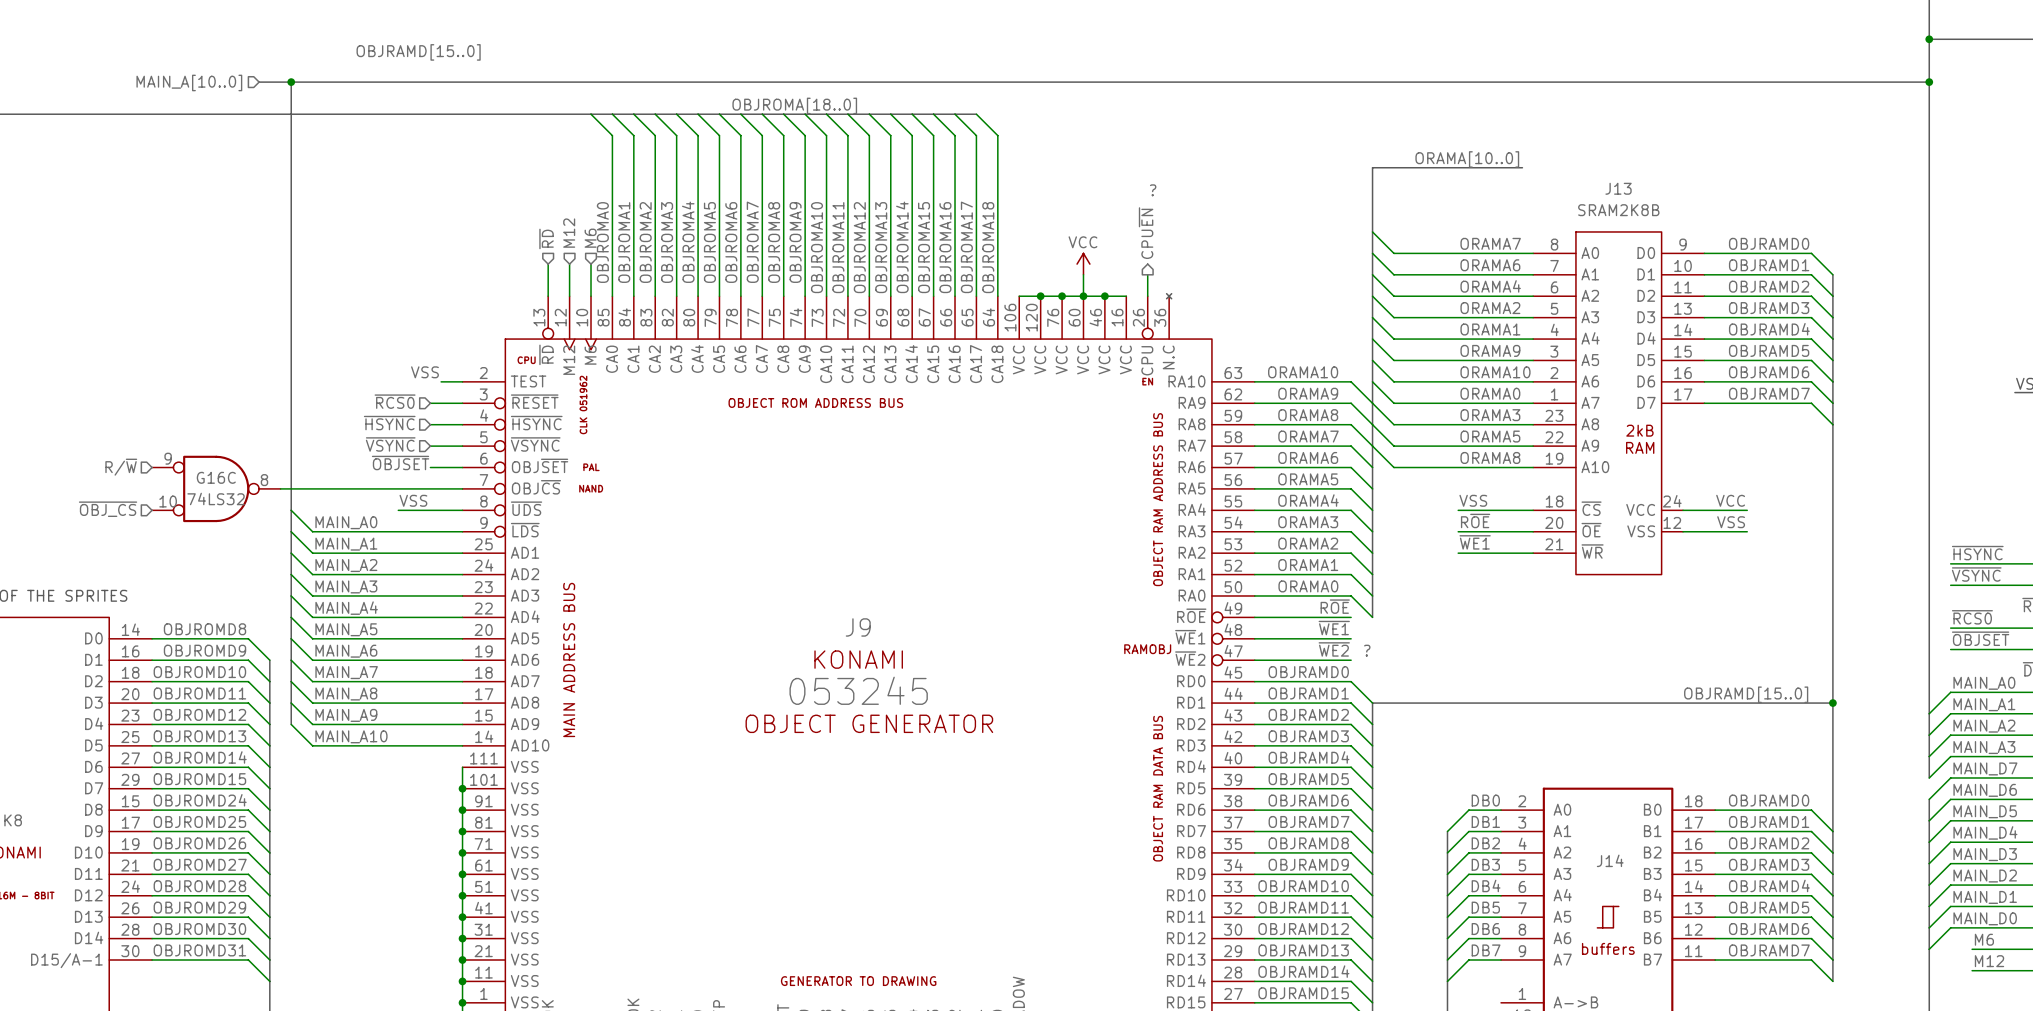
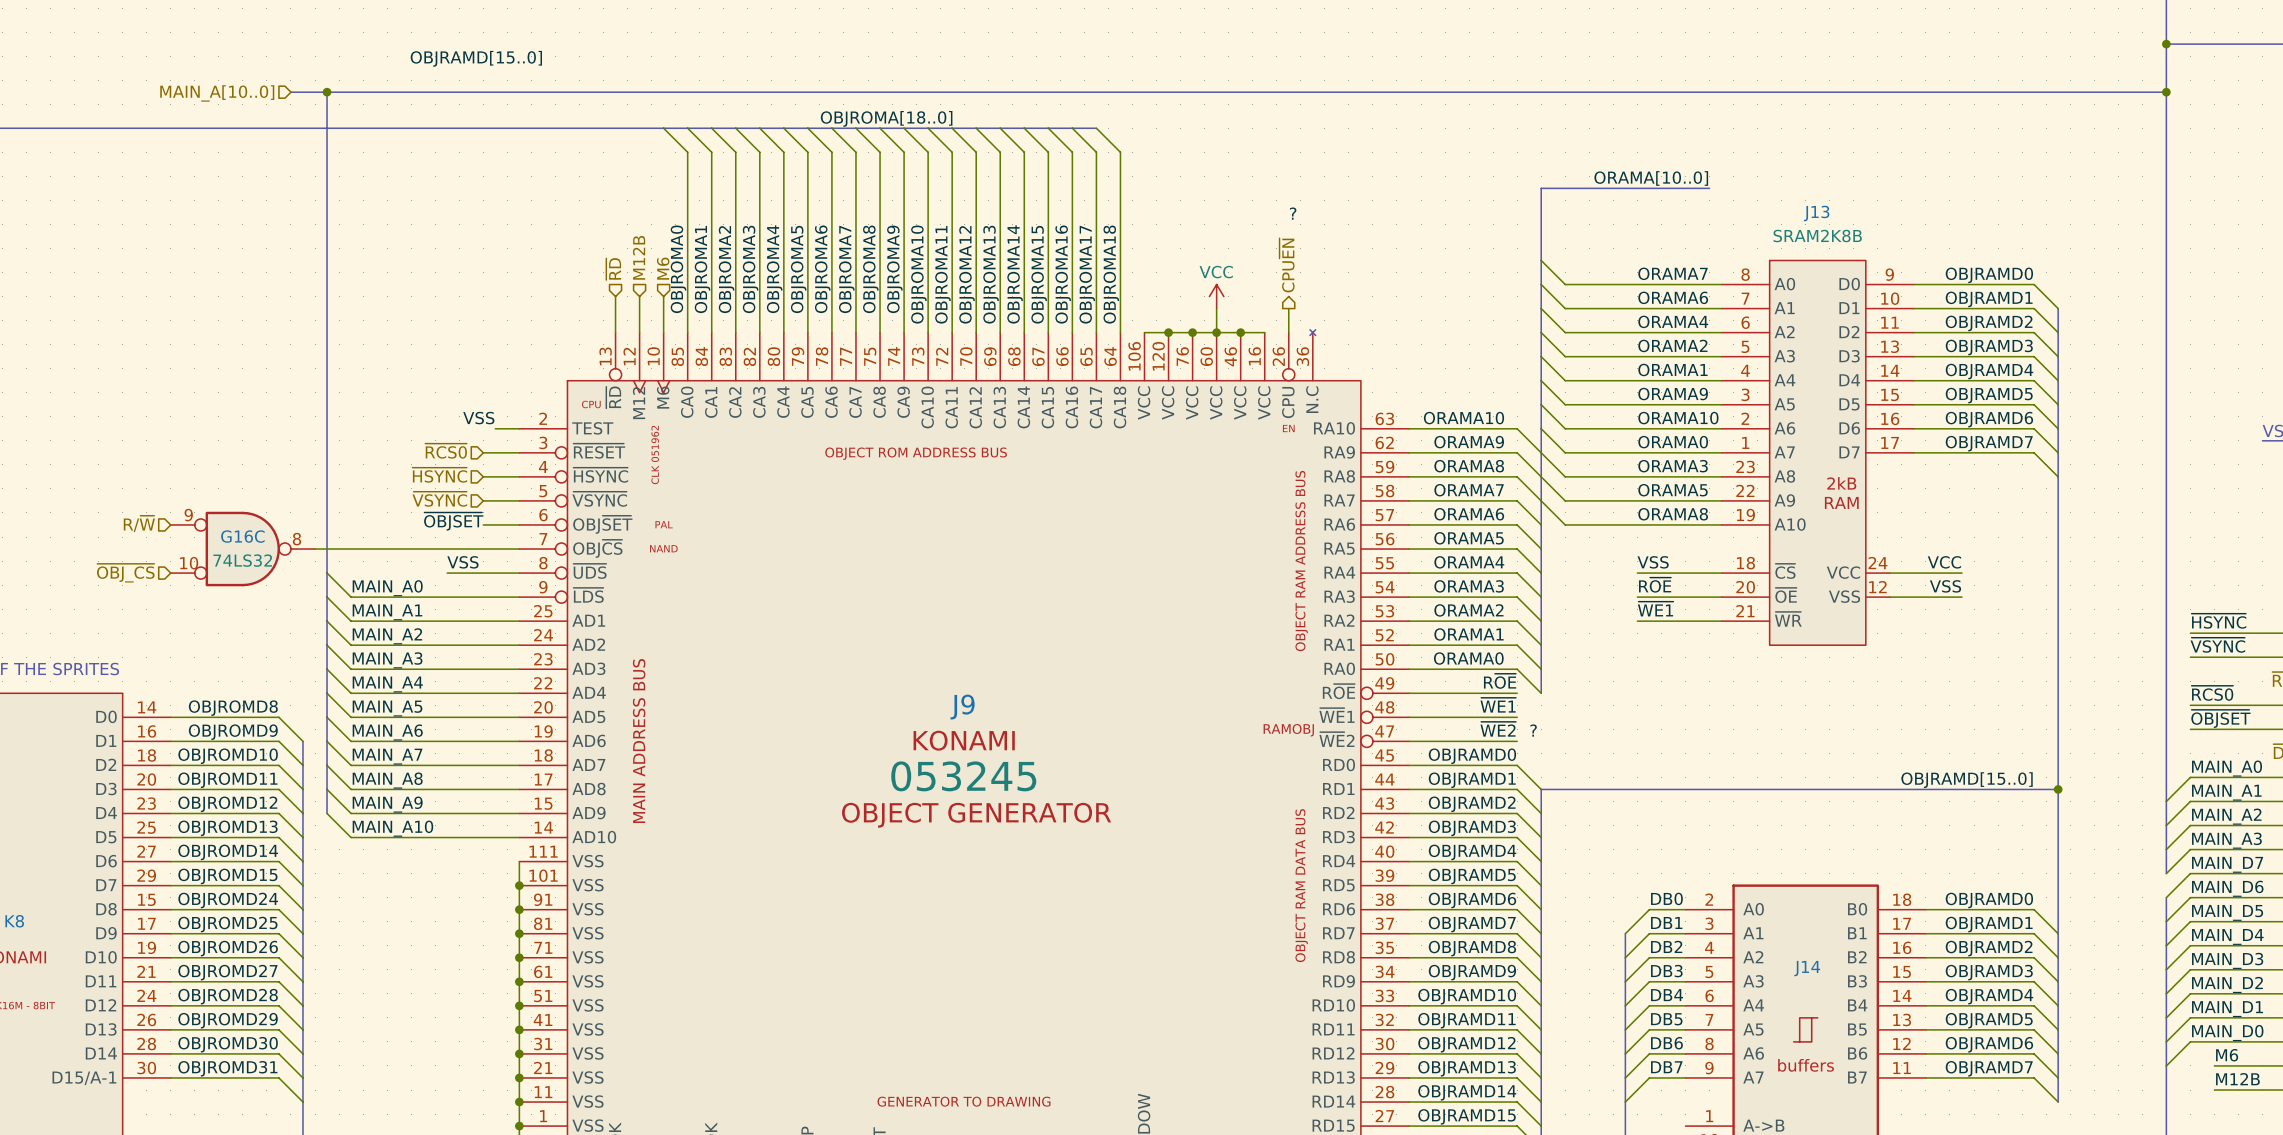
hierarchical label: M12 (569, 233) -> M12B (639, 257)
label: M12 (1989, 961) -> M12B (2237, 1079)

